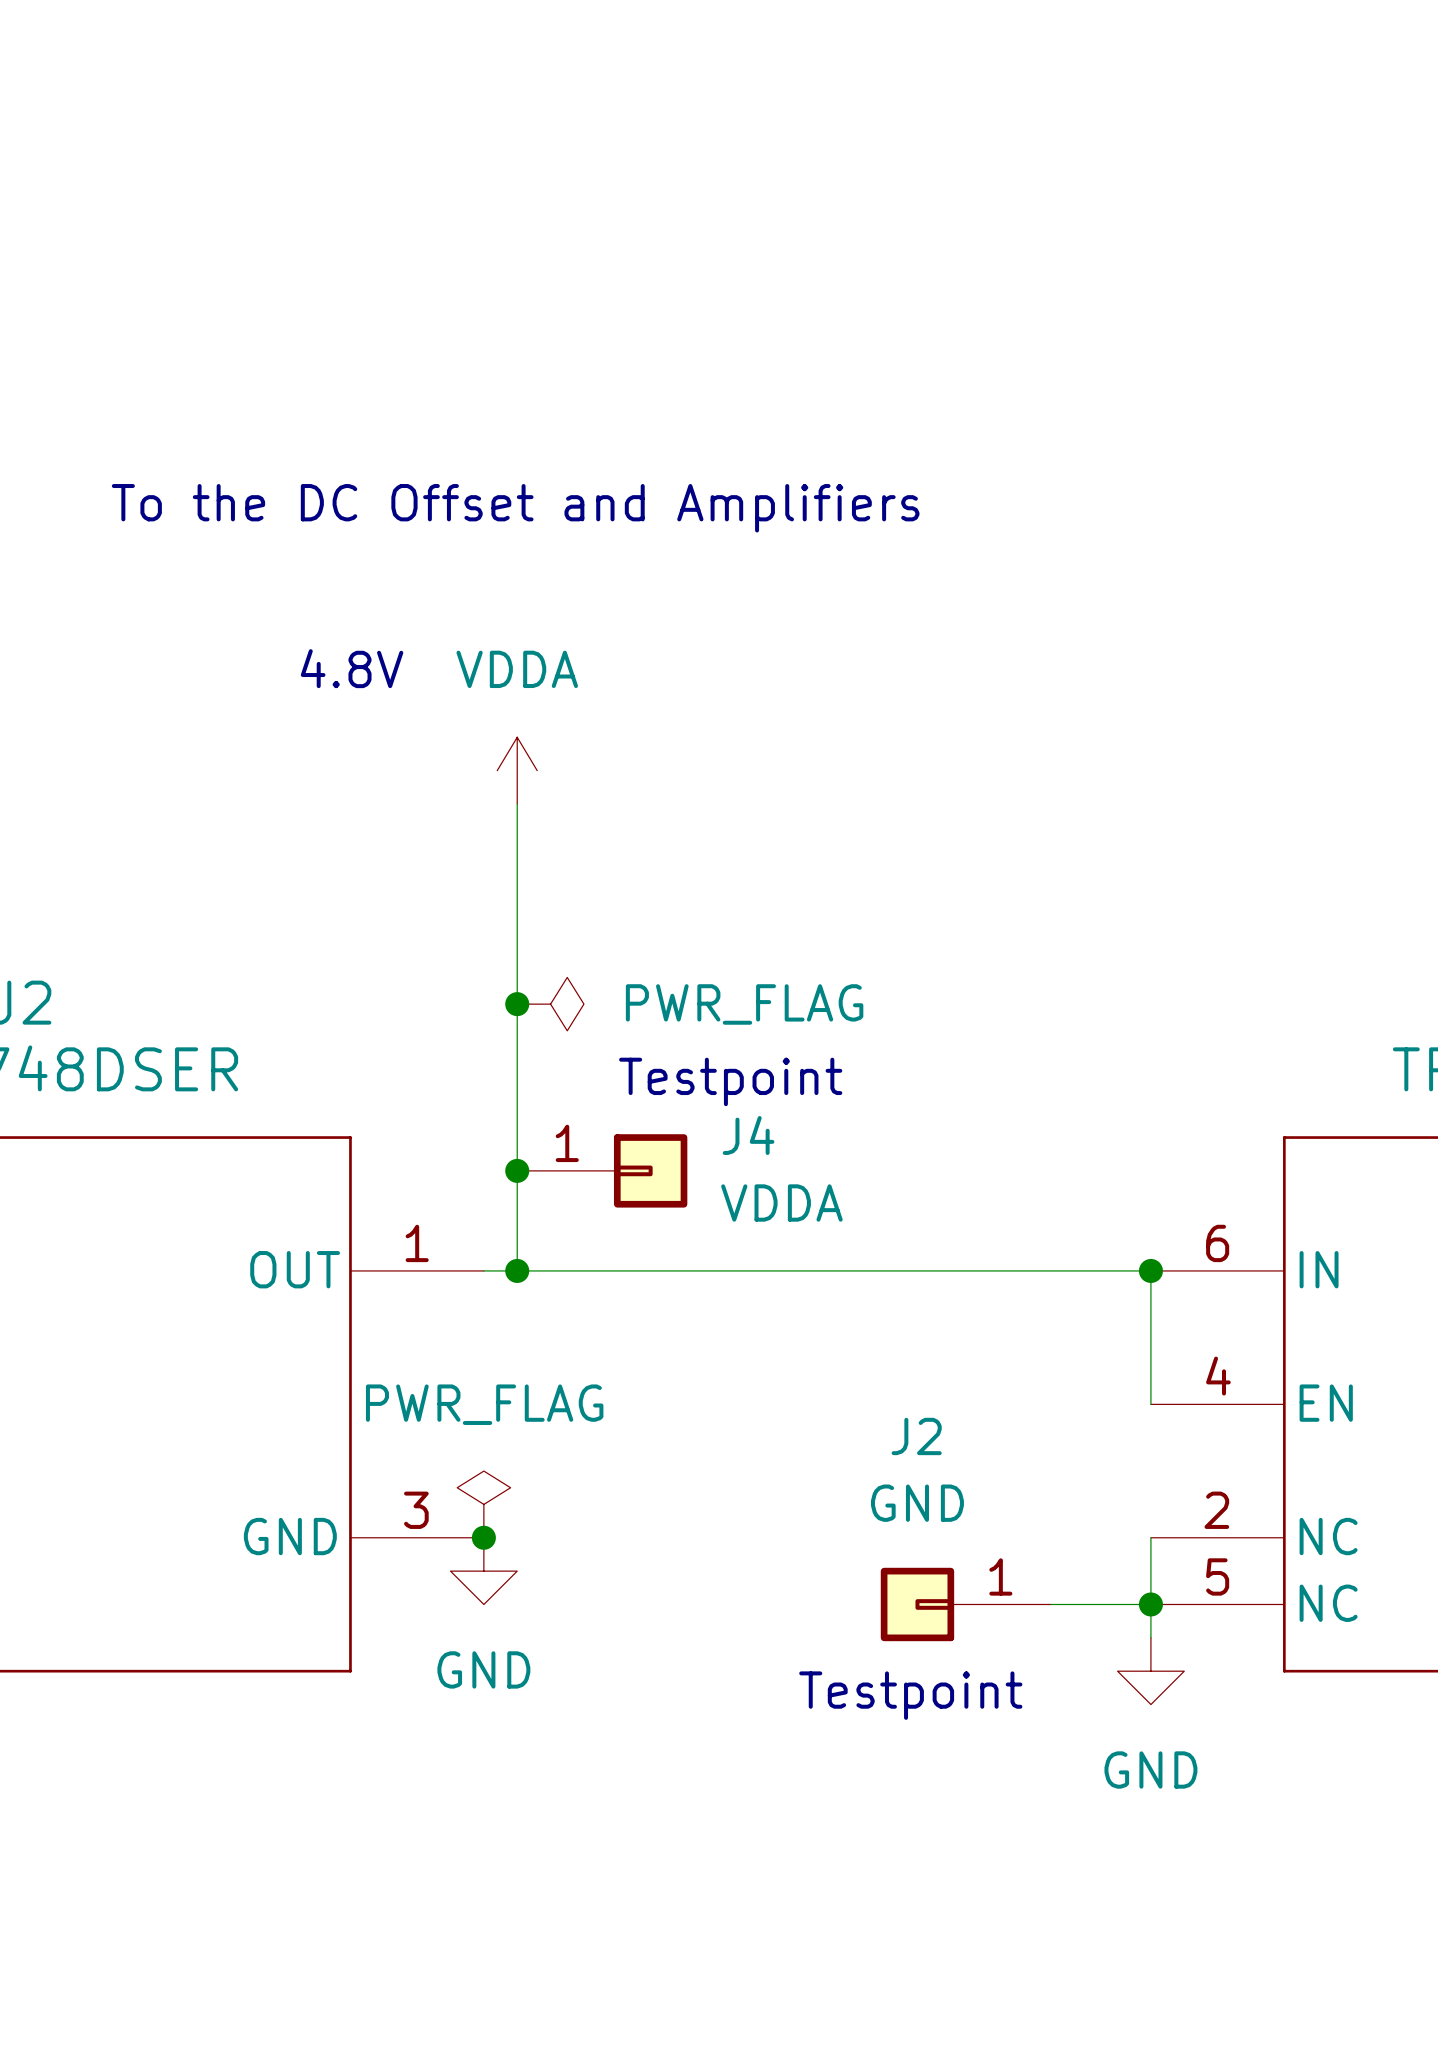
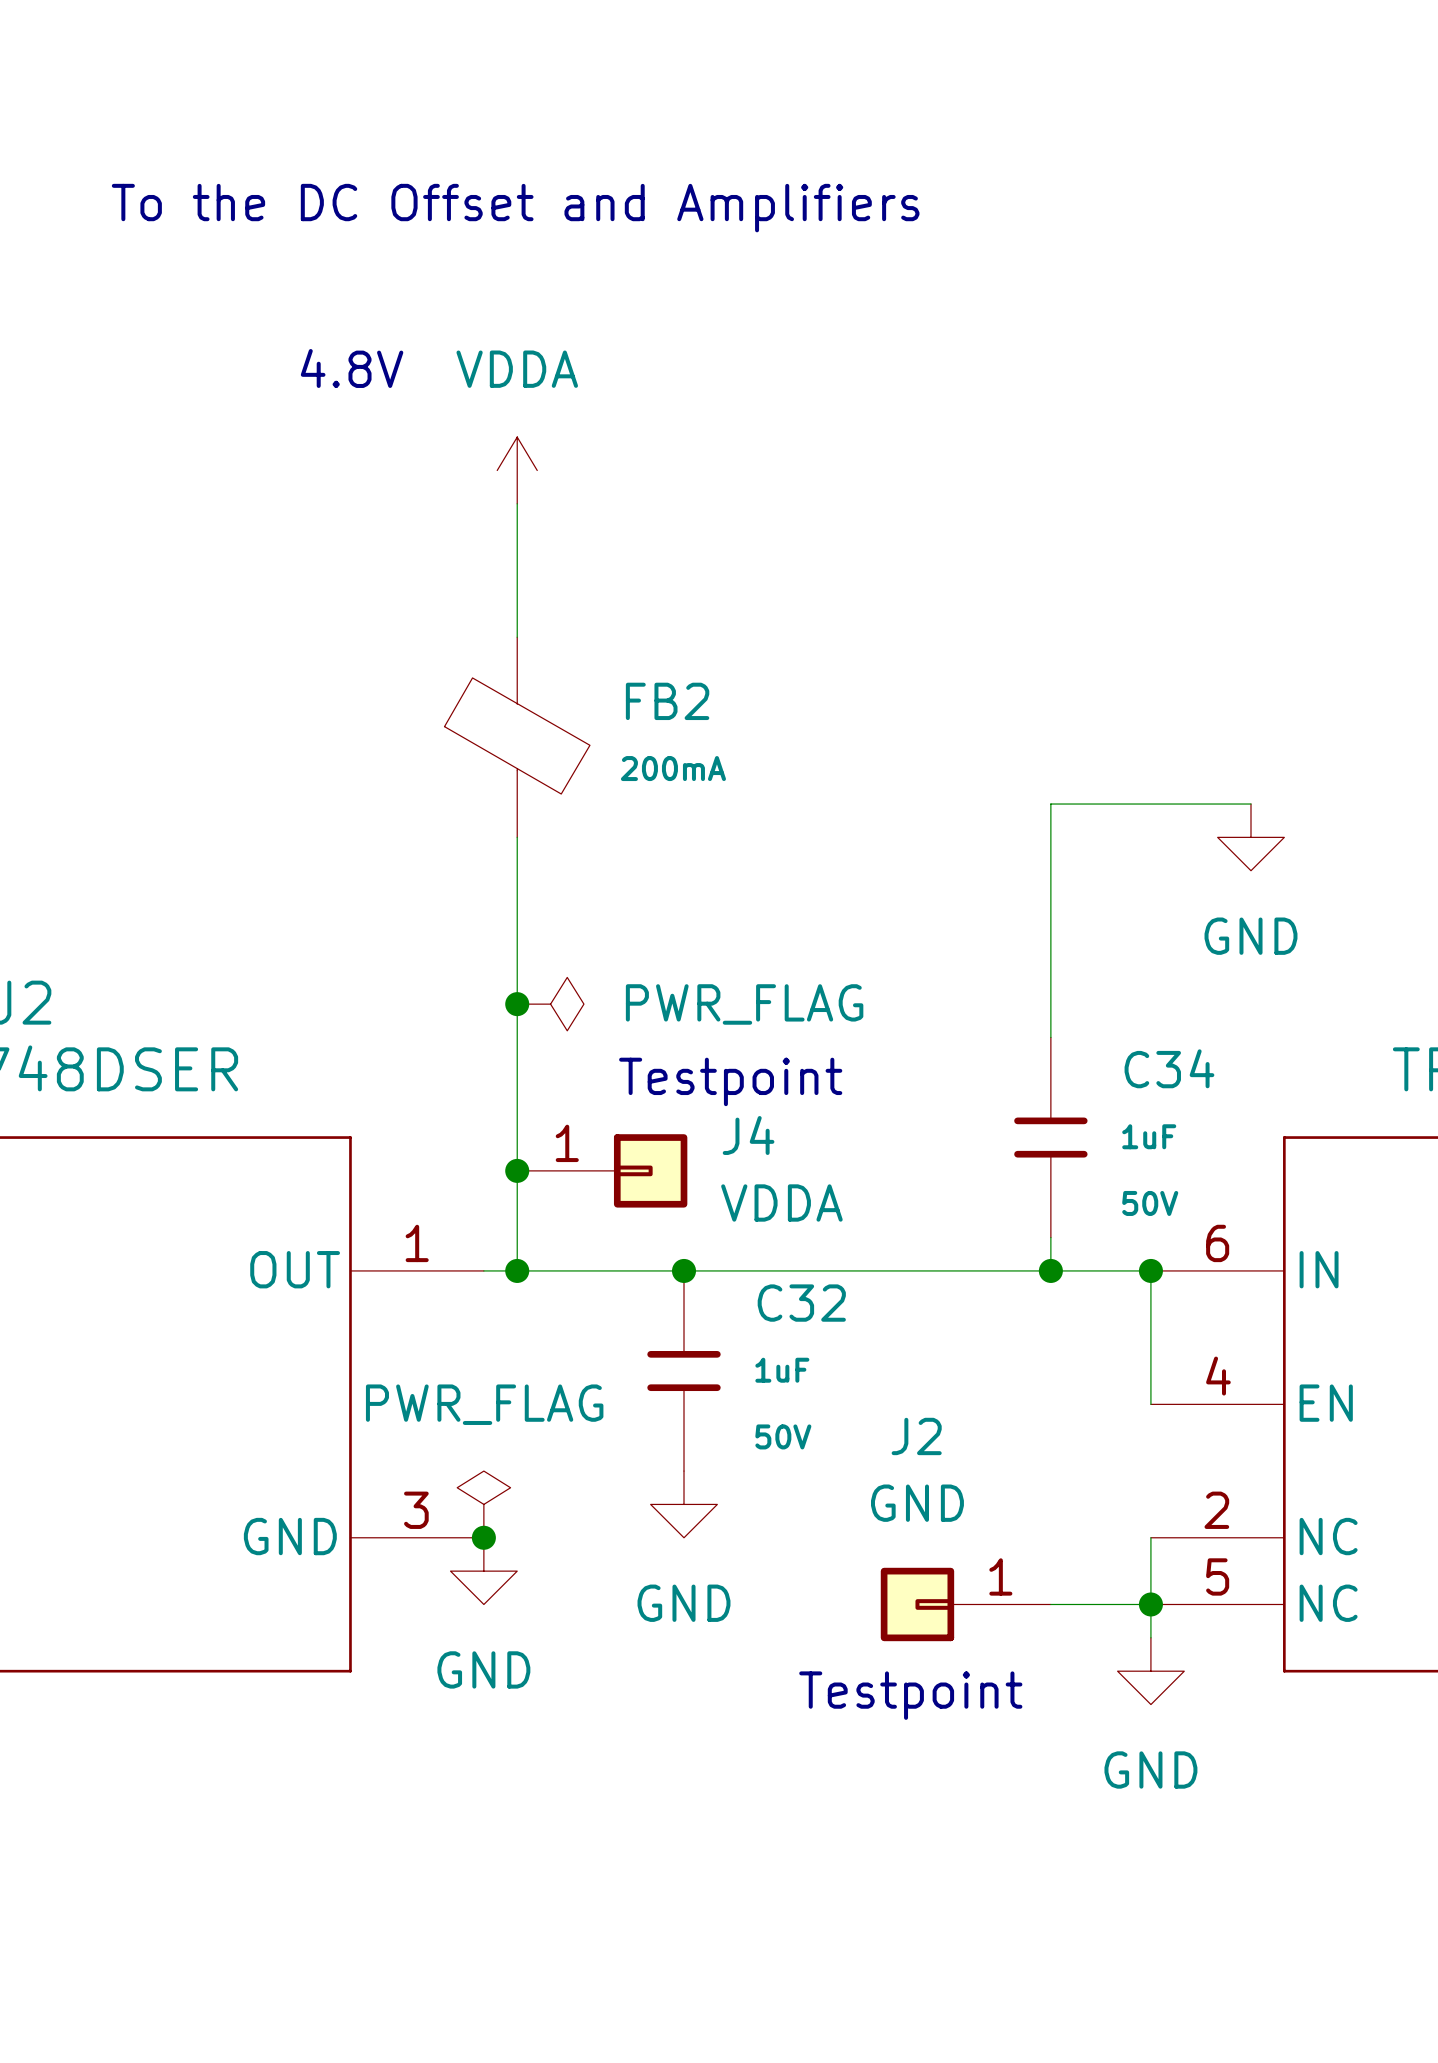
wire: none -> (517, 503) (517, 637)
text position: To the DC Offset and Amplifiers (515, 508) -> To the DC Offset and Amplifiers (515, 208)
text position: 4.8V (352, 668) -> 4.8V (352, 368)
FB2: none -> (517, 737)
power symbol position: VDDA (517, 770) -> VDDA (517, 470)
wire: none -> (1251, 804) (1050, 804) (1050, 1037)
power symbol: none -> GND (1251, 837)
C34: none -> 1uF (1050, 1137)
wire: none -> (1050, 1237) (1050, 1270)
junction: none -> (684, 1270)
junction: none -> (1050, 1270)
C32: none -> 1uF (684, 1371)
power symbol: none -> GND (684, 1504)

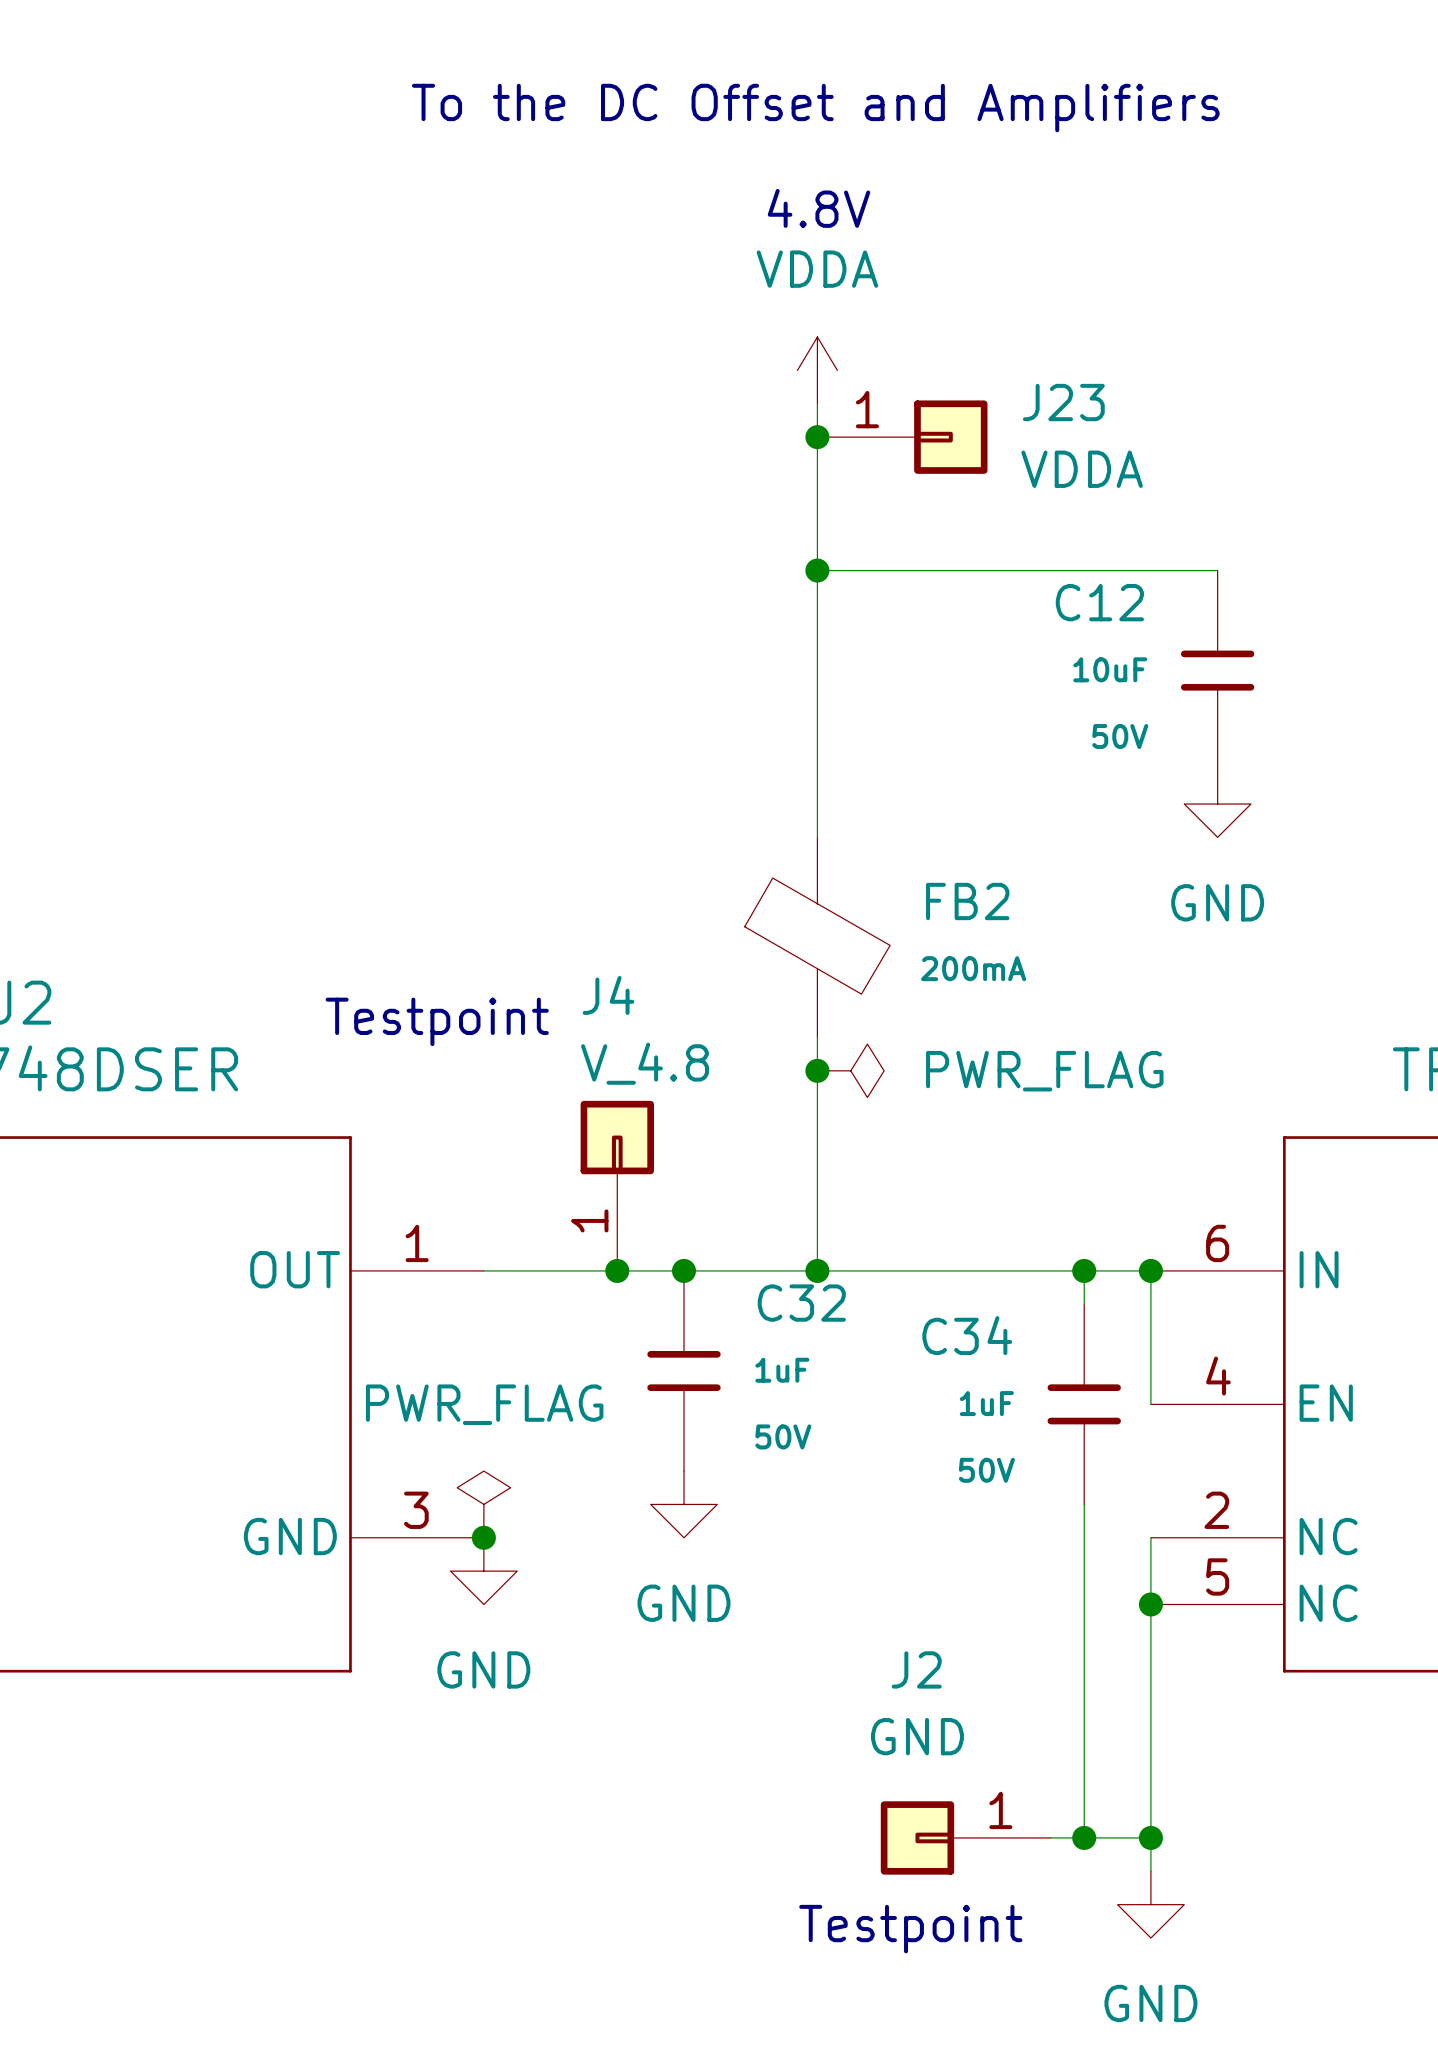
text position: To the DC Offset and Amplifiers (515, 208) -> To the DC Offset and Amplifiers (815, 108)
text position: 4.8V (352, 368) -> 4.8V (819, 208)
junction: none -> (817, 437)
J23: none -> VDDA (902, 437)
power symbol position: VDDA (517, 470) -> VDDA (817, 370)
wire: (517, 503) (517, 637) -> none
wire: none -> (817, 570) (1217, 570)
junction: none -> (817, 570)
C12: none -> 10uF (1217, 670)
FB2 position: (517, 737) -> (817, 937)
wire: (1251, 804) (1050, 804) (1050, 1037) -> none
wire: (517, 837) (517, 1270) -> (817, 403) (817, 837)
power symbol position: GND (1251, 837) -> GND (1217, 804)
junction: (517, 1004) -> none
power symbol position: PWR_FLAG (550, 1004) -> PWR_FLAG (850, 1070)
wire: none -> (817, 1037) (817, 1270)
C34 name position: C34 (1169, 1068) -> C34 (967, 1335)
junction: none -> (817, 1070)
text position: Testpoint (730, 1081) -> Testpoint (437, 1021)
C34 value position: 1uF (1149, 1136) -> 1uF (986, 1403)
C34 position: (1050, 1137) -> (1084, 1404)
junction: (517, 1170) -> none
J4 rotation: 0° (650, 1170) -> 90° counterclockwise (617, 1137)
J4 value: VDDA (781, 1203) -> V_4.8 (645, 1063)
C34 text position: 50V (1150, 1203) -> 50V (986, 1470)
wire: (1050, 1237) (1050, 1270) -> (1084, 1270) (1084, 1304)
junction: (517, 1270) -> none
junction: none -> (617, 1270)
junction: none -> (817, 1270)
junction position: (1050, 1270) -> (1084, 1270)
wire: none -> (1084, 1504) (1084, 1837)
J2 position: (965, 1604) -> (965, 1837)
wire: (1050, 1604) (1150, 1604) -> (1050, 1837) (1150, 1837)
wire: none -> (1150, 1637) (1150, 1871)
power symbol position: GND (1150, 1671) -> GND (1150, 1904)
text position: Testpoint (910, 1695) -> Testpoint (910, 1929)
junction: none -> (1084, 1837)
junction: none -> (1150, 1837)

